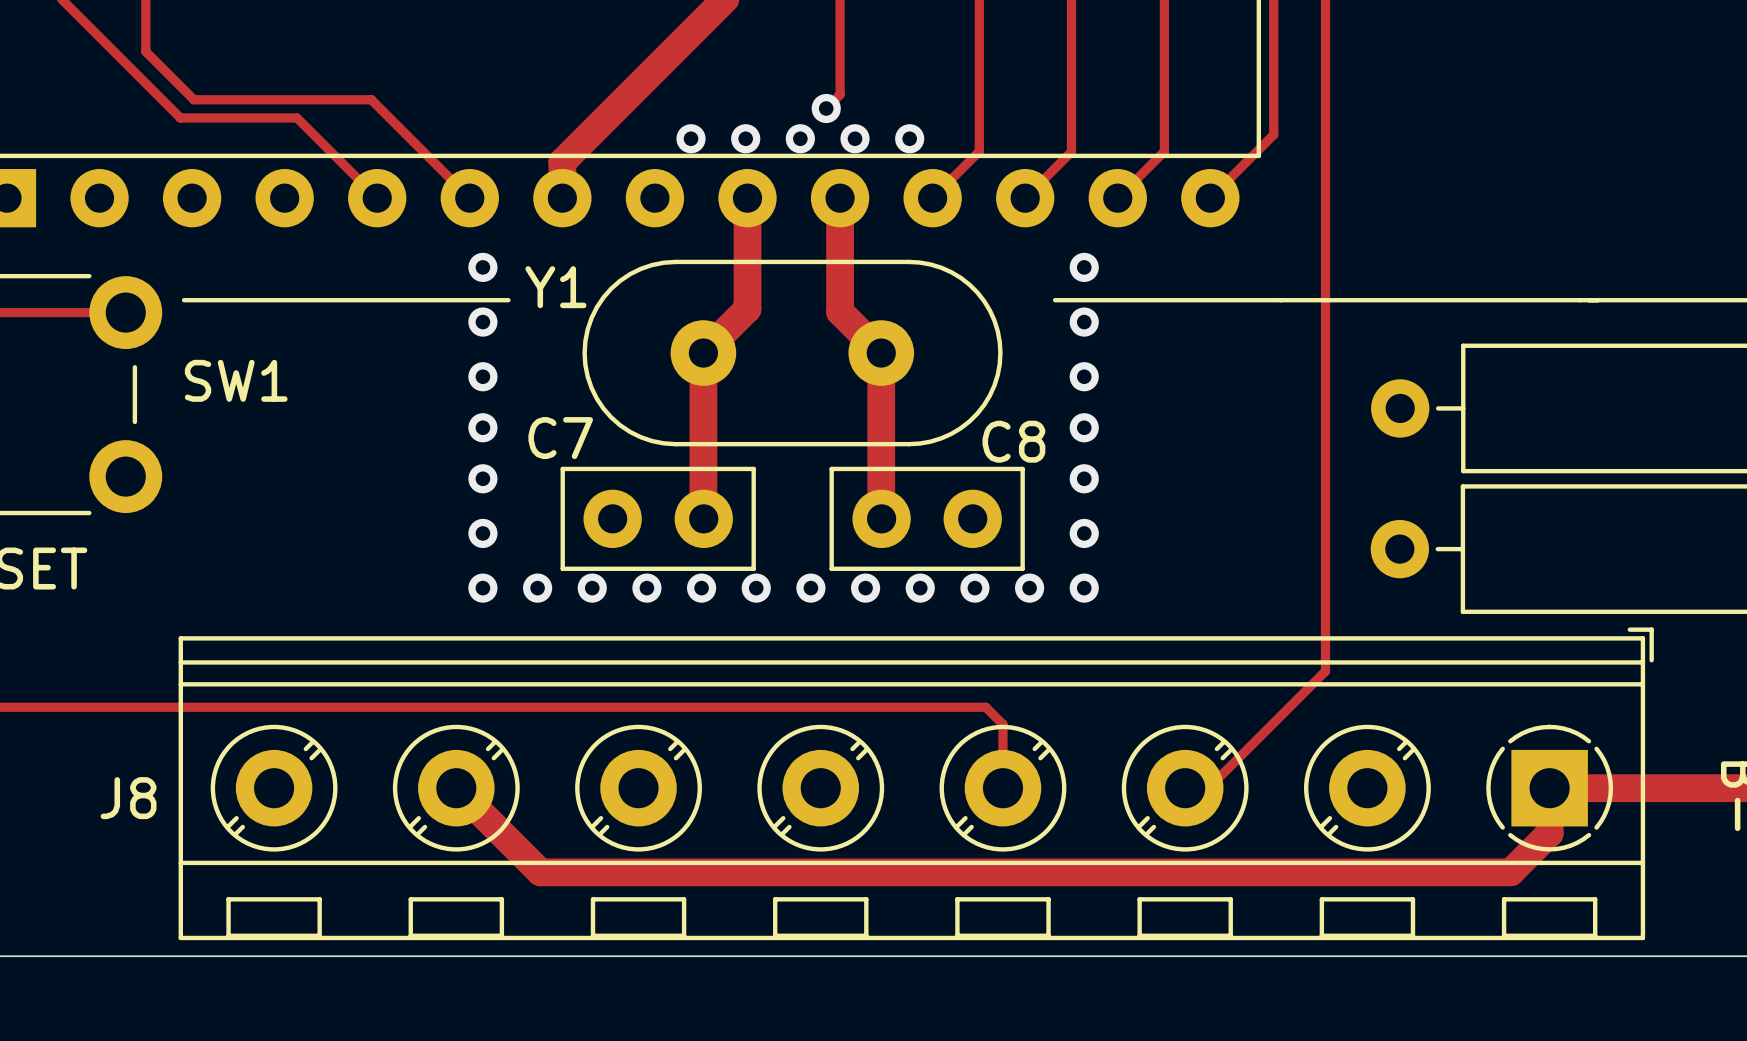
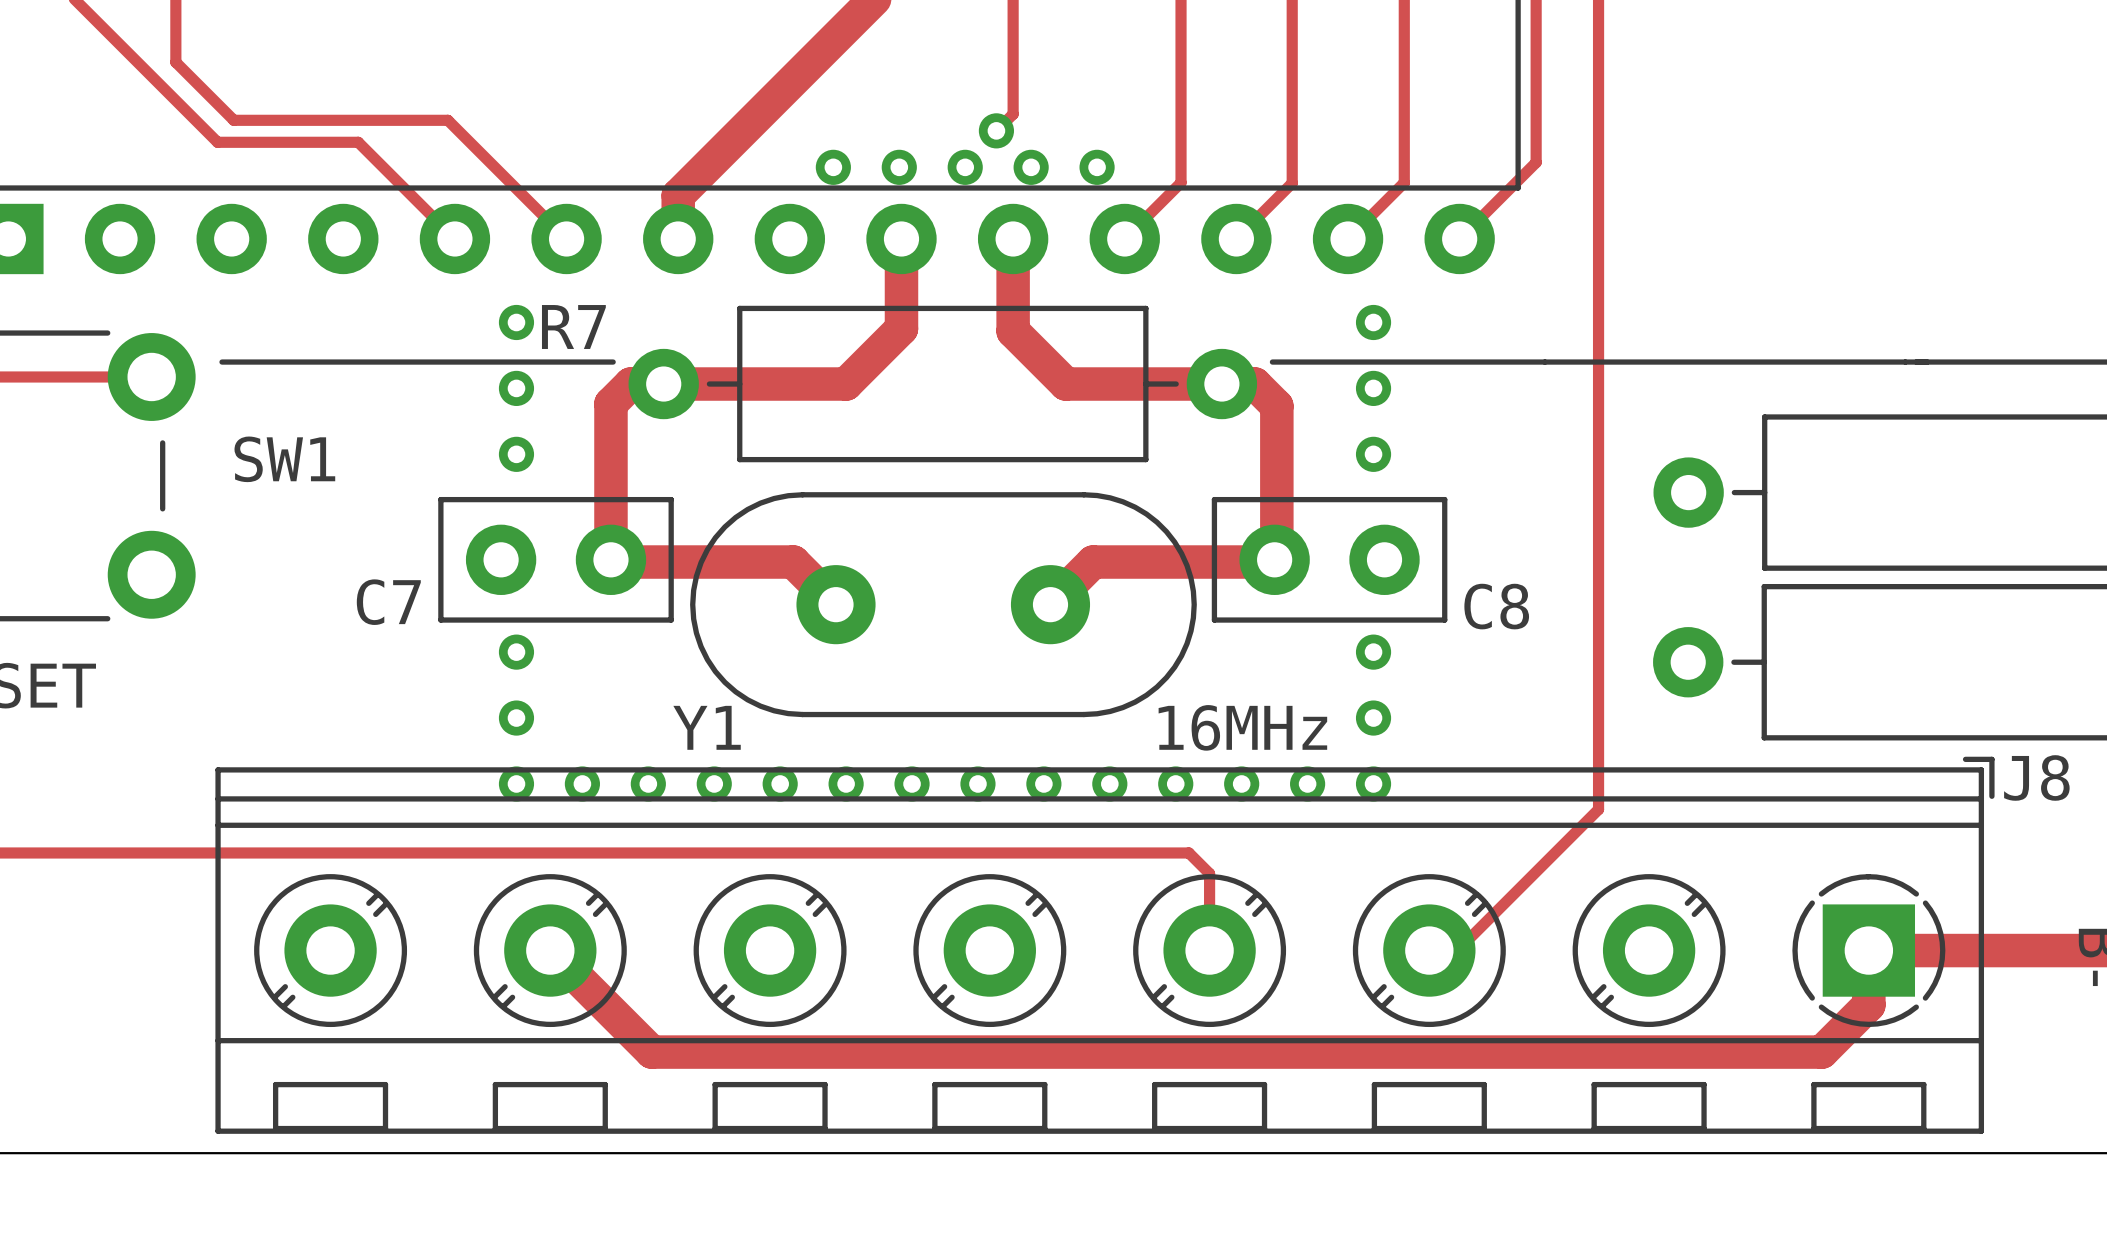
via: none -> (516, 322)
via: (482, 267) -> none
via: (1084, 267) -> none
via: none -> (1373, 322)
track: (747, 272) (747, 308) (703, 353) (703, 502) -> (901, 328) (846, 384) (630, 384) (610, 403) (610, 559) (613, 562) (793, 562) (836, 604)
track: (840, 274) (840, 311) (881, 353) (881, 501) -> (1013, 331) (1065, 384) (1254, 384) (1276, 405) (1276, 562) (1093, 562) (1050, 604)
Y1 name position: Y1 (555, 287) -> Y1 (707, 727)
R7: none -> (942, 384)
via: none -> (516, 388)
via: (482, 322) -> none
via: (1084, 322) -> none
via: none -> (1373, 388)
Y1 position: (792, 353) -> (943, 604)
via: none -> (516, 454)
via: (482, 376) -> none
via: (1084, 376) -> none
via: none -> (1373, 454)
via: (482, 427) -> none
via: (1084, 427) -> none
C7 name position: C7 (560, 438) -> C7 (388, 602)
C8 name position: C8 (1013, 441) -> C8 (1496, 606)
via: (482, 478) -> none
via: (1084, 478) -> none
C7 position: (658, 518) -> (556, 559)
C8 position: (927, 518) -> (1329, 559)
via: (482, 533) -> none
via: (1084, 533) -> none
via: none -> (516, 652)
via: none -> (1373, 652)
via: (482, 588) -> none
via: (537, 588) -> none
via: (592, 588) -> none
via: (646, 588) -> none
via: (701, 588) -> none
via: (756, 588) -> none
via: (810, 588) -> none
via: (865, 588) -> none
via: (920, 588) -> none
via: (974, 588) -> none
via: (1029, 588) -> none
via: (1084, 588) -> none
via: none -> (516, 718)
via: none -> (1373, 718)
text: none -> 16MHz (1242, 727)
via: none -> (516, 783)
via: none -> (582, 783)
via: none -> (648, 783)
via: none -> (714, 783)
via: none -> (780, 783)
via: none -> (846, 783)
via: none -> (912, 783)
via: none -> (977, 783)
via: none -> (1043, 783)
via: none -> (1109, 783)
via: none -> (1175, 783)
via: none -> (1241, 783)
via: none -> (1307, 783)
via: none -> (1373, 783)
J8 name position: J8 (128, 798) -> J8 (2036, 777)

